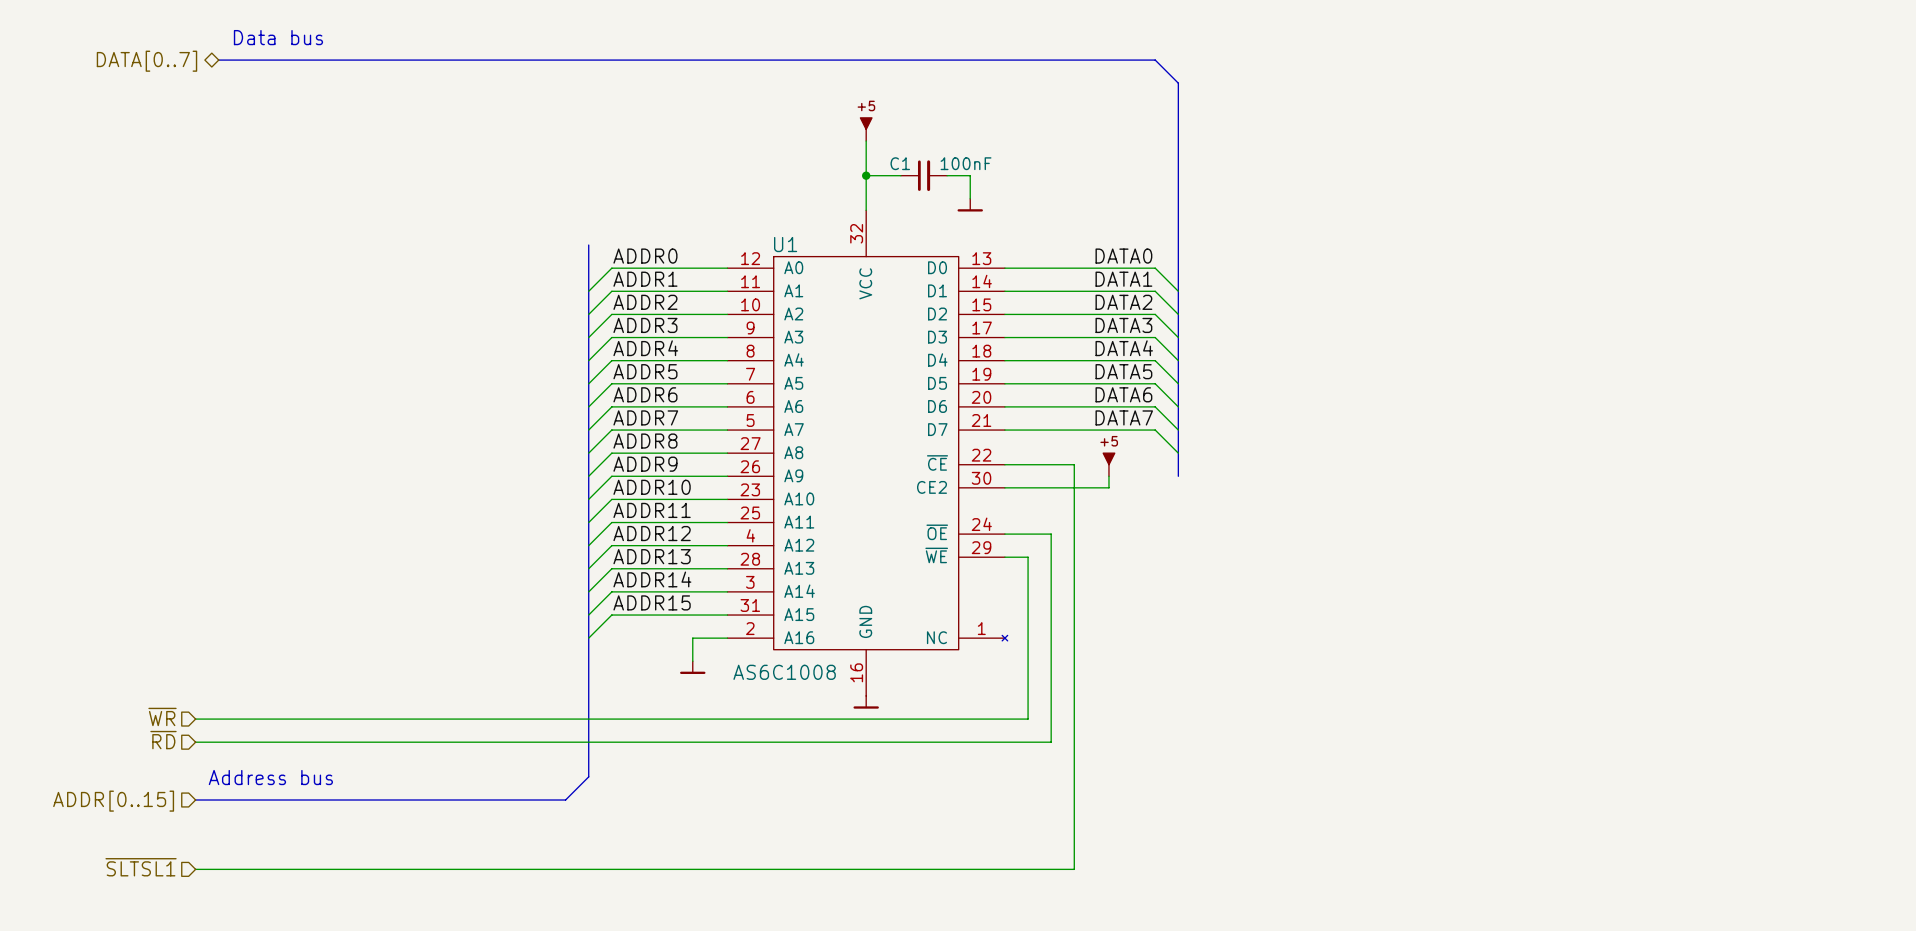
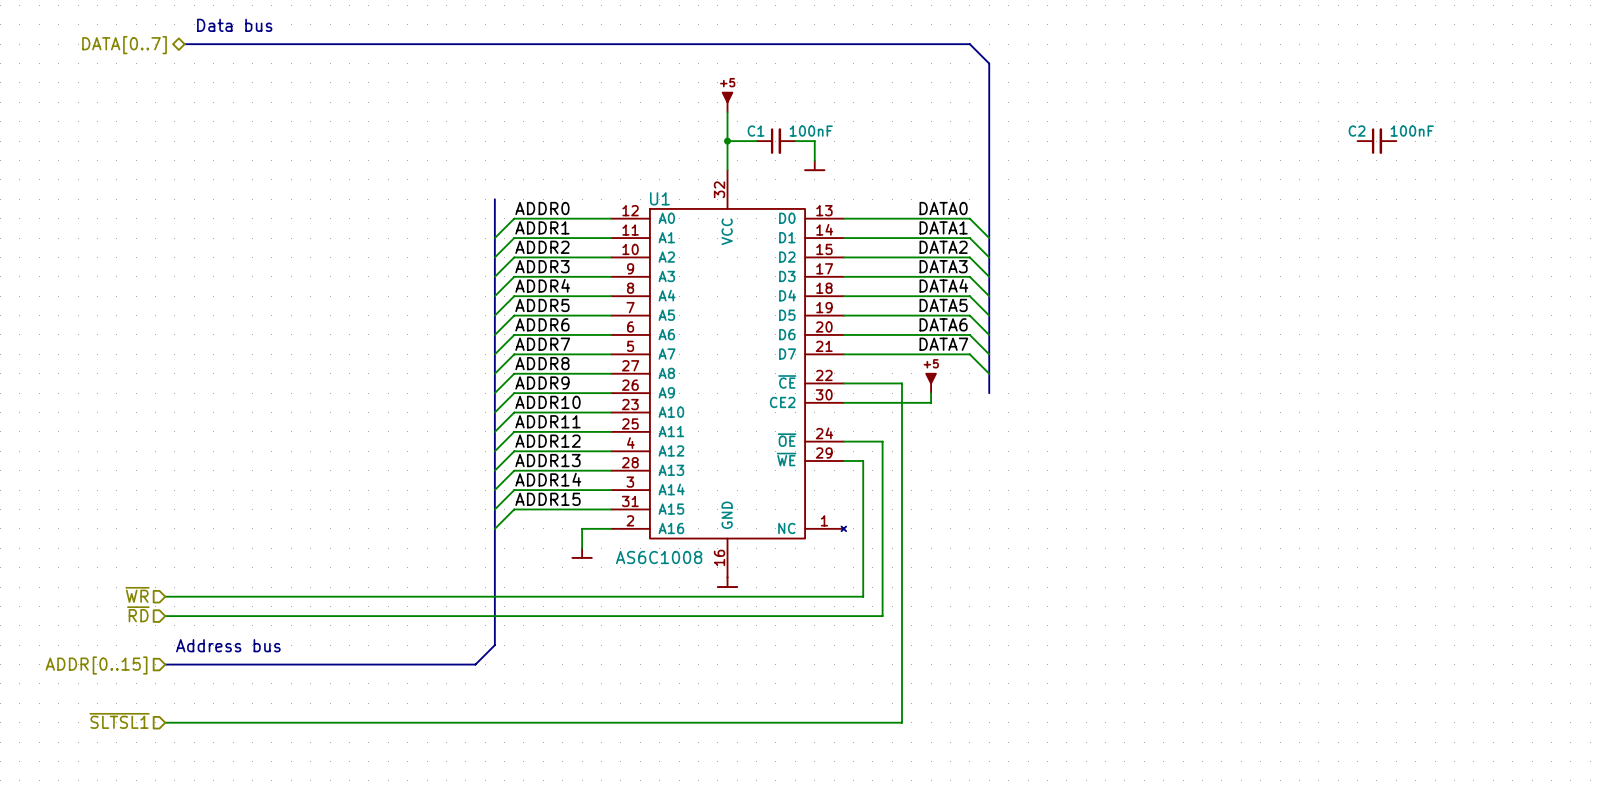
C2: none -> 100nF (1376, 141)

